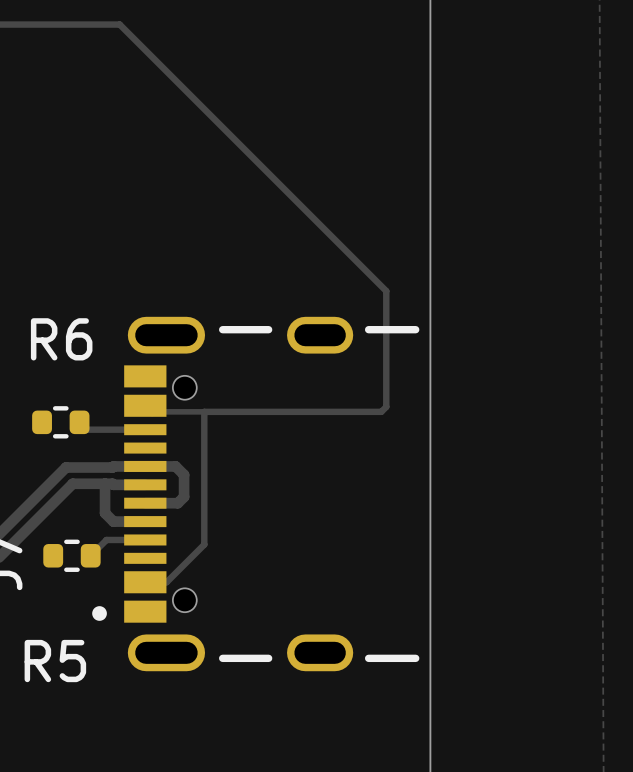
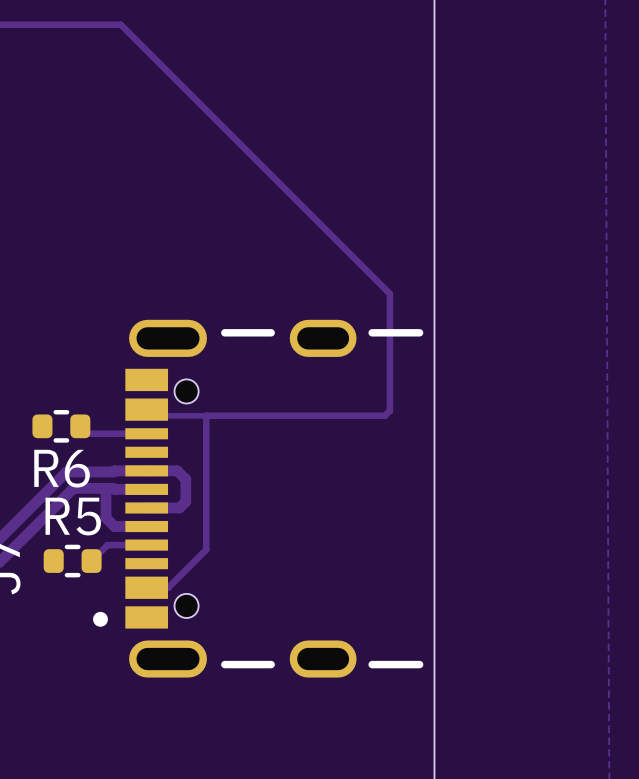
R6 name position: R6 (61, 339) -> R6 (62, 468)
R5 name position: R5 (55, 661) -> R5 (73, 516)

